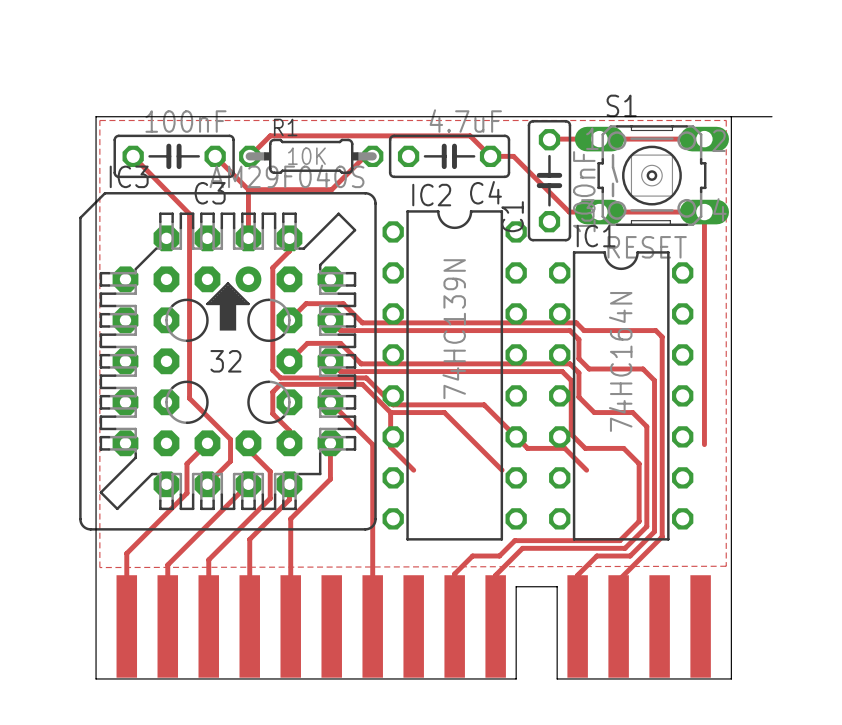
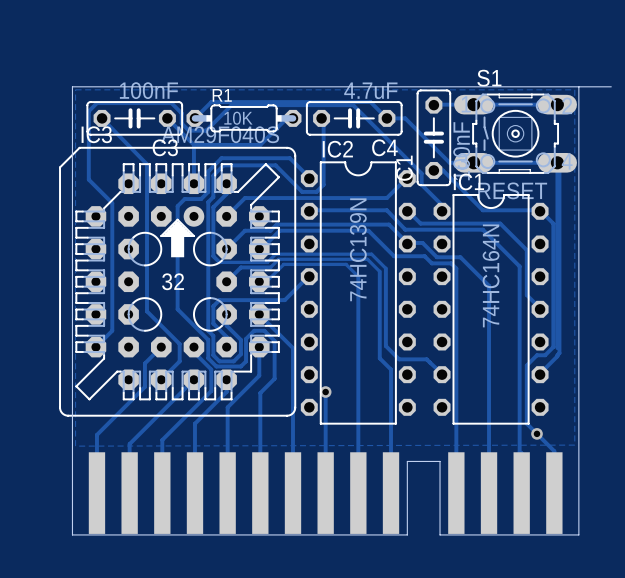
track: none -> (321, 118) (323, 120) (323, 184) (316, 191) (302, 191) (275, 165) (223, 165) (213, 175) (213, 197) (208, 202) (208, 330) (213, 335) (213, 355) (219, 361) (233, 361) (240, 354) (240, 339) (226, 325) (226, 314)
track: none -> (557, 162) (559, 164) (559, 353) (540, 373)
track: none -> (433, 170) (443, 170) (482, 210) (540, 210) (553, 223) (553, 347) (545, 355) (537, 355) (526, 365) (526, 423) (554, 451) (554, 493)
track: none -> (309, 177) (289, 158) (221, 158) (208, 171) (208, 191) (201, 199) (184, 199) (177, 206) (177, 309) (208, 339) (208, 358) (216, 366) (240, 366) (246, 361) (246, 338) (254, 330) (264, 330) (274, 340) (274, 378) (260, 393) (260, 493)
track: none -> (407, 177) (386, 198) (245, 198) (226, 216)
track: none -> (309, 210) (386, 210) (405, 229) (482, 229) (519, 266) (519, 452) (521, 453) (521, 493)
track: none -> (407, 210) (420, 223) (500, 223) (526, 250) (526, 295) (540, 308)
track: none -> (442, 210) (442, 205) (421, 184) (421, 173) (353, 105) (231, 105) (206, 130) (188, 130) (181, 123) (181, 113) (171, 103) (96, 103) (88, 111) (88, 179) (112, 203) (112, 330) (95, 347)
track: (306, 303) (343, 303) (362, 322) (576, 322) (584, 330) (655, 330) (662, 336) (662, 536) (618, 580) -> none
track: (330, 320) (340, 330) (553, 330) -> (239, 235) (245, 230) (270, 230) (276, 224) (388, 224) (407, 242) (422, 242) (436, 257)
track: none -> (259, 249) (279, 230) (368, 230) (394, 256) (424, 256) (431, 263) (451, 263) (456, 268) (456, 452)
track: (272, 329) (272, 370) (280, 377) (366, 377) (393, 404) (484, 404) (527, 448) (564, 448) (586, 470) -> (213, 256) (219, 262) (267, 262) (275, 254) (371, 254) (385, 268) (385, 346) (399, 359) (426, 359) (442, 373)
track: (569, 330) (578, 339) (578, 358) (589, 369) (642, 369) (654, 380) (654, 531) (630, 556) (596, 556) (577, 575) -> (450, 257) (460, 257) (489, 285) (489, 456)
track: (340, 343) (361, 363) (569, 363) (578, 372) (578, 397) (594, 412) (632, 412) (646, 426) (646, 526) (625, 548) (522, 548) (495, 575) -> (267, 267) (270, 267) (278, 259) (367, 259) (379, 271) (379, 358) (391, 369) (391, 452)
track: (330, 361) (340, 371) (562, 371) (571, 380) (571, 434) (585, 448) (623, 448) (639, 463) (639, 521) (619, 540) (514, 540) (499, 556) (472, 556) (454, 573) -> (259, 281) (266, 281) (283, 264) (346, 264) (358, 276) (358, 451)
track: (362, 384) (390, 412) -> (284, 300) (309, 275)
track: (390, 412) (444, 412) (502, 470) -> none
track: (390, 412) (390, 447) (413, 470) -> none
track: none -> (325, 392) (325, 493)
via: none -> (325, 392)
via: none -> (537, 433)

